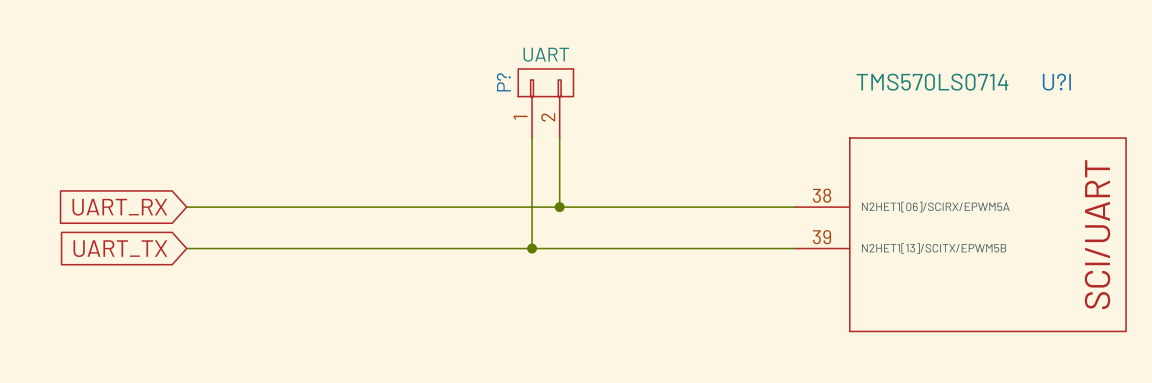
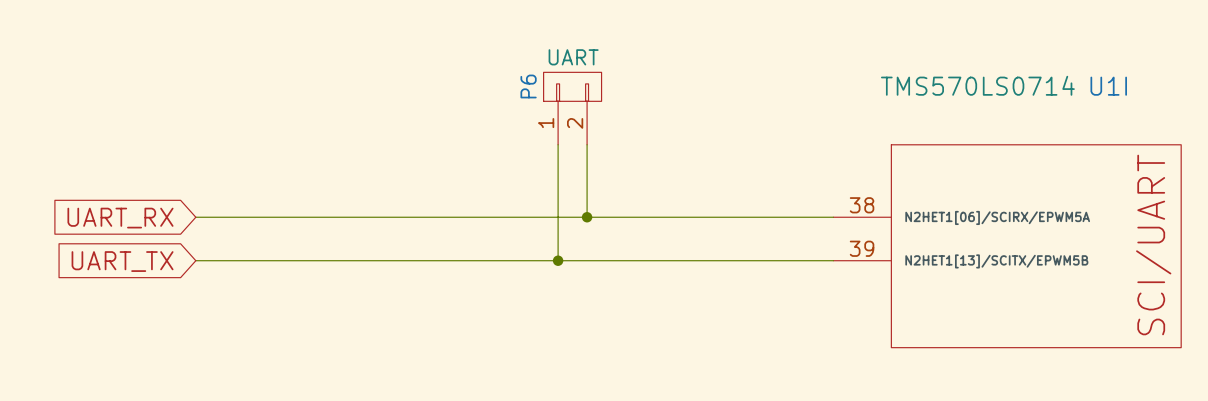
P? name: P? (503, 82) -> P6 (528, 86)
U?I name: U?I (1056, 82) -> U1I (1108, 86)

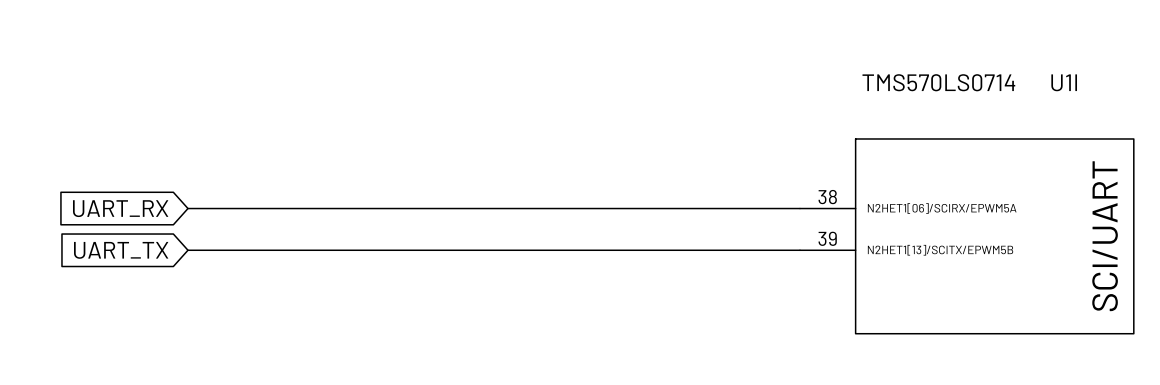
P6: UART (572, 108) -> none
wire: (558, 144) (558, 260) -> none
wire: (587, 144) (587, 217) -> none
junction: (587, 217) -> none
junction: (558, 260) -> none

